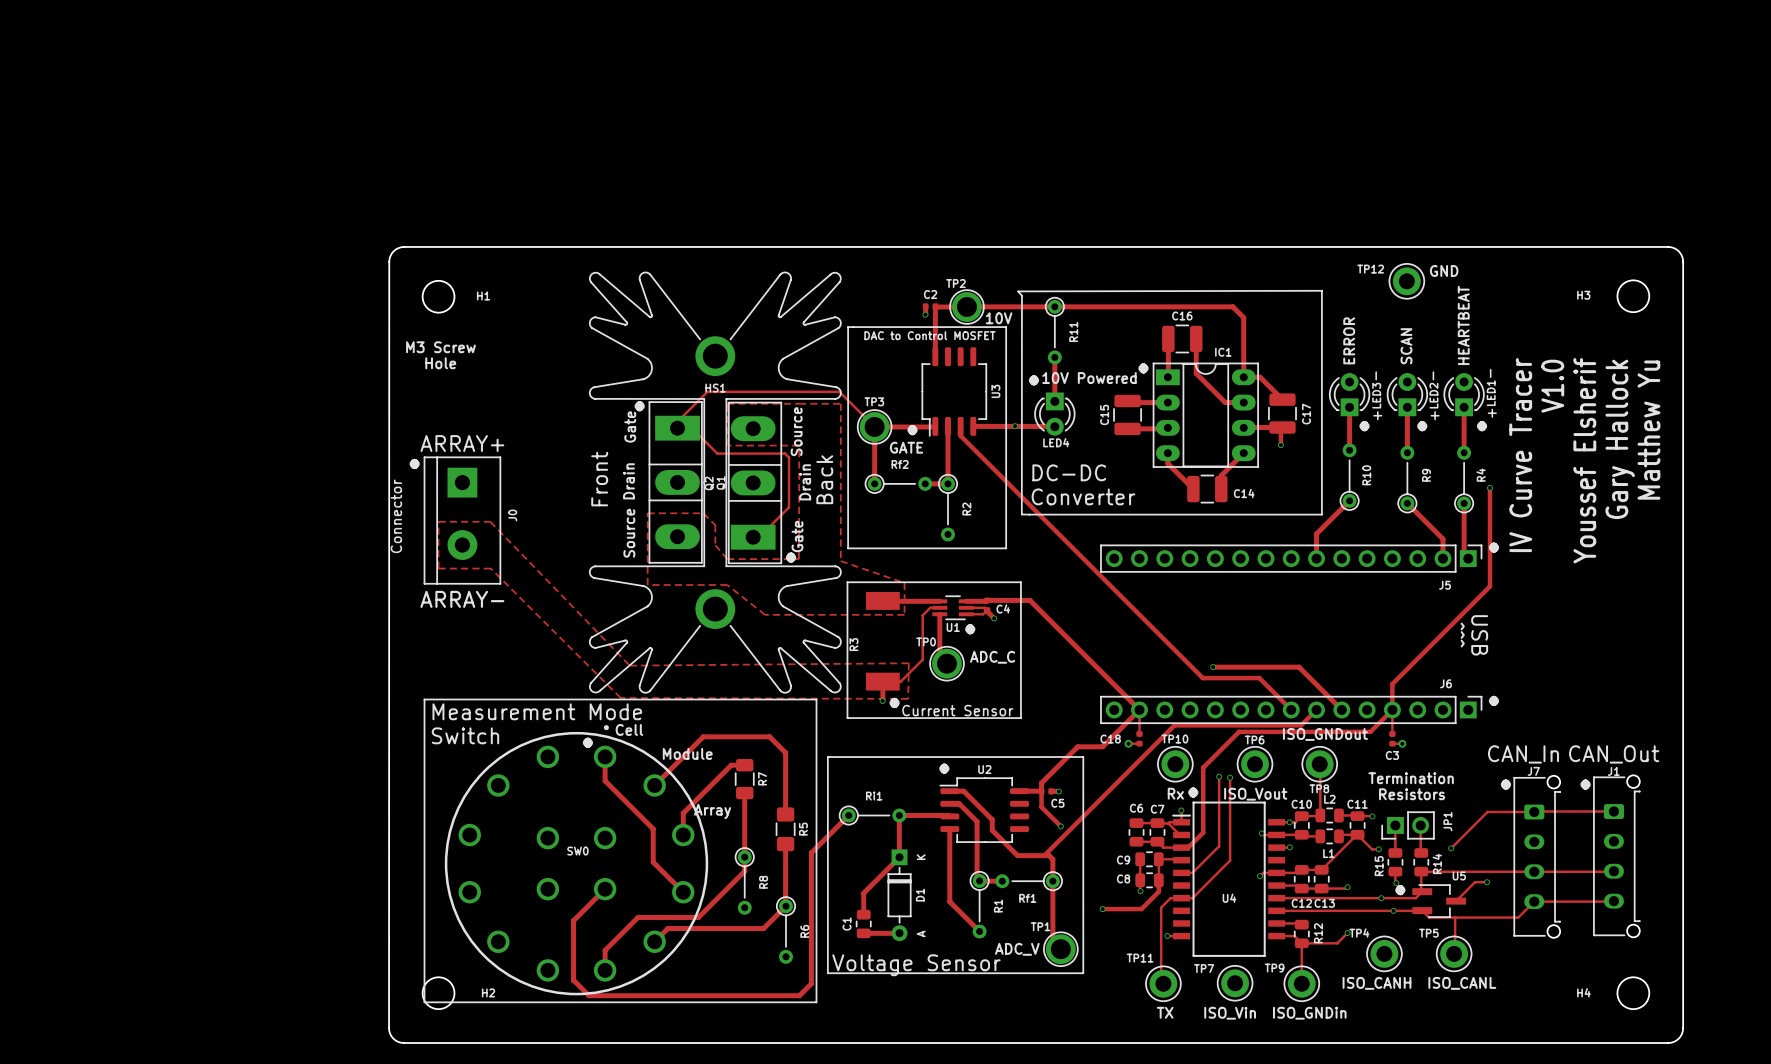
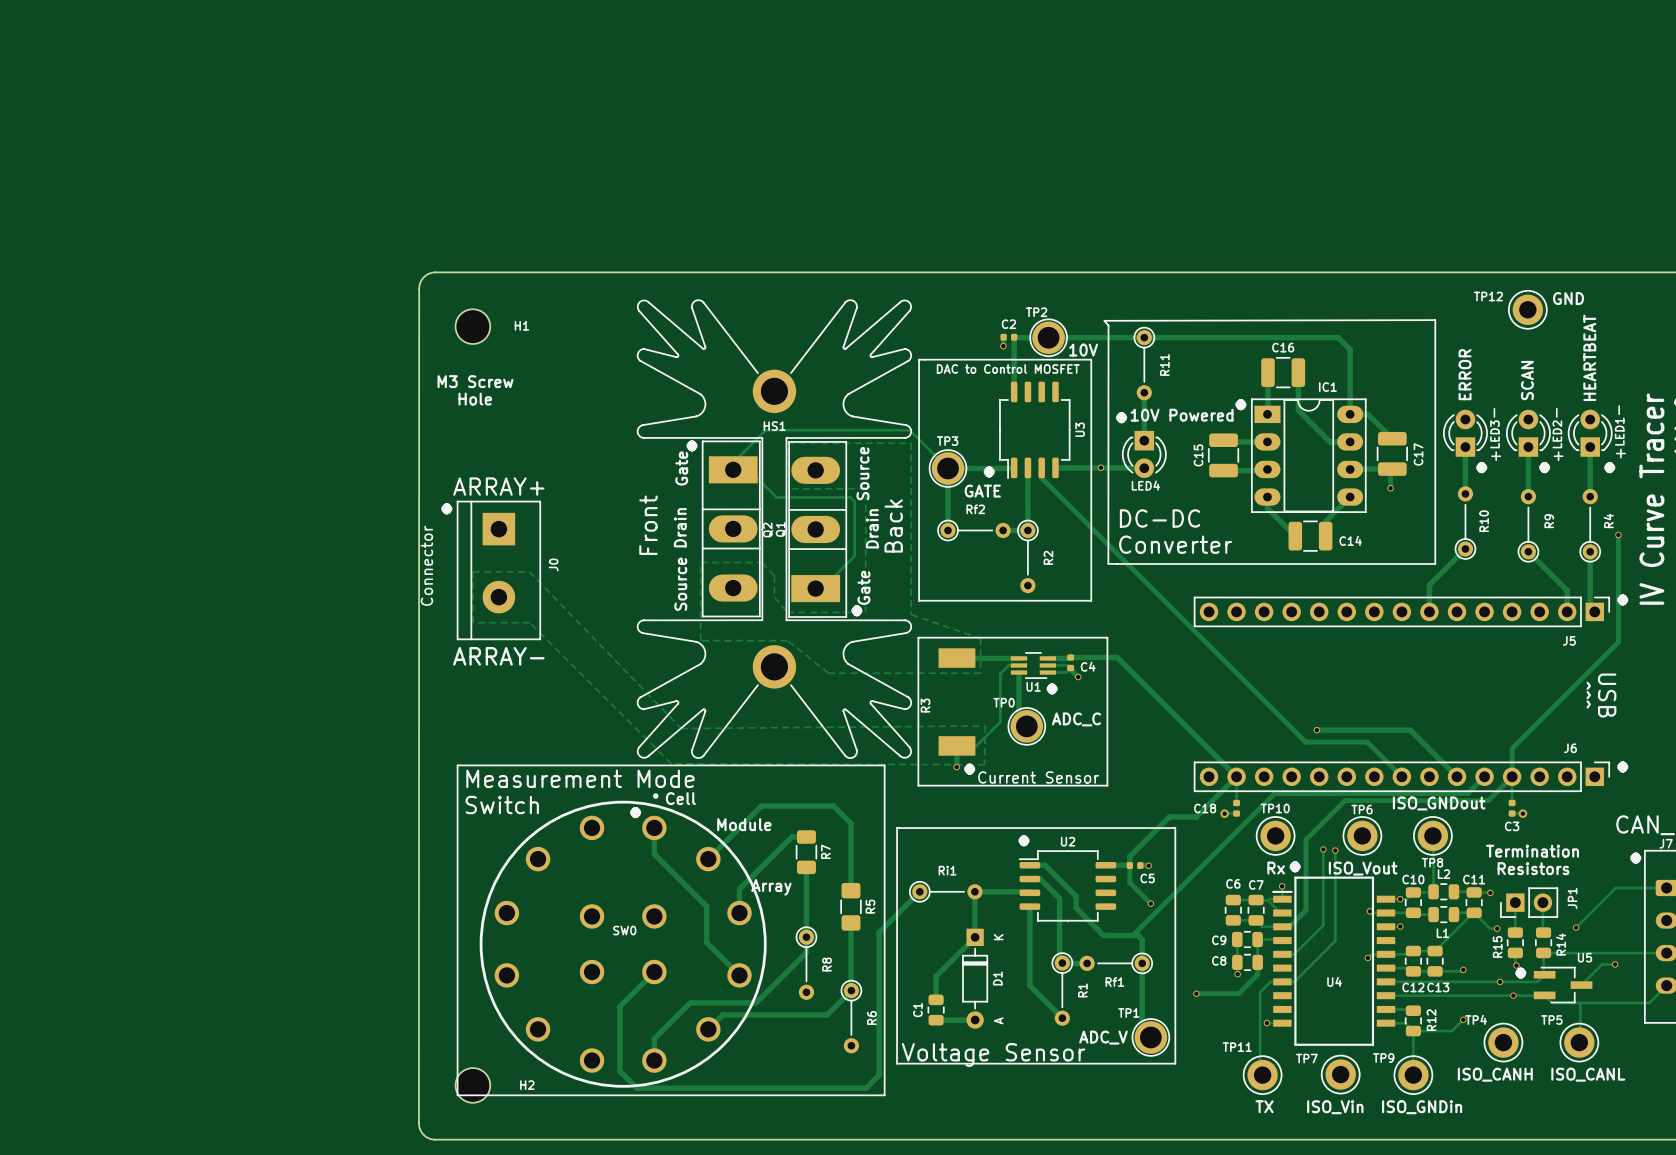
track: (1316, 709) (1301, 725) -> (1484, 776) (1467, 793) (1412, 793)

